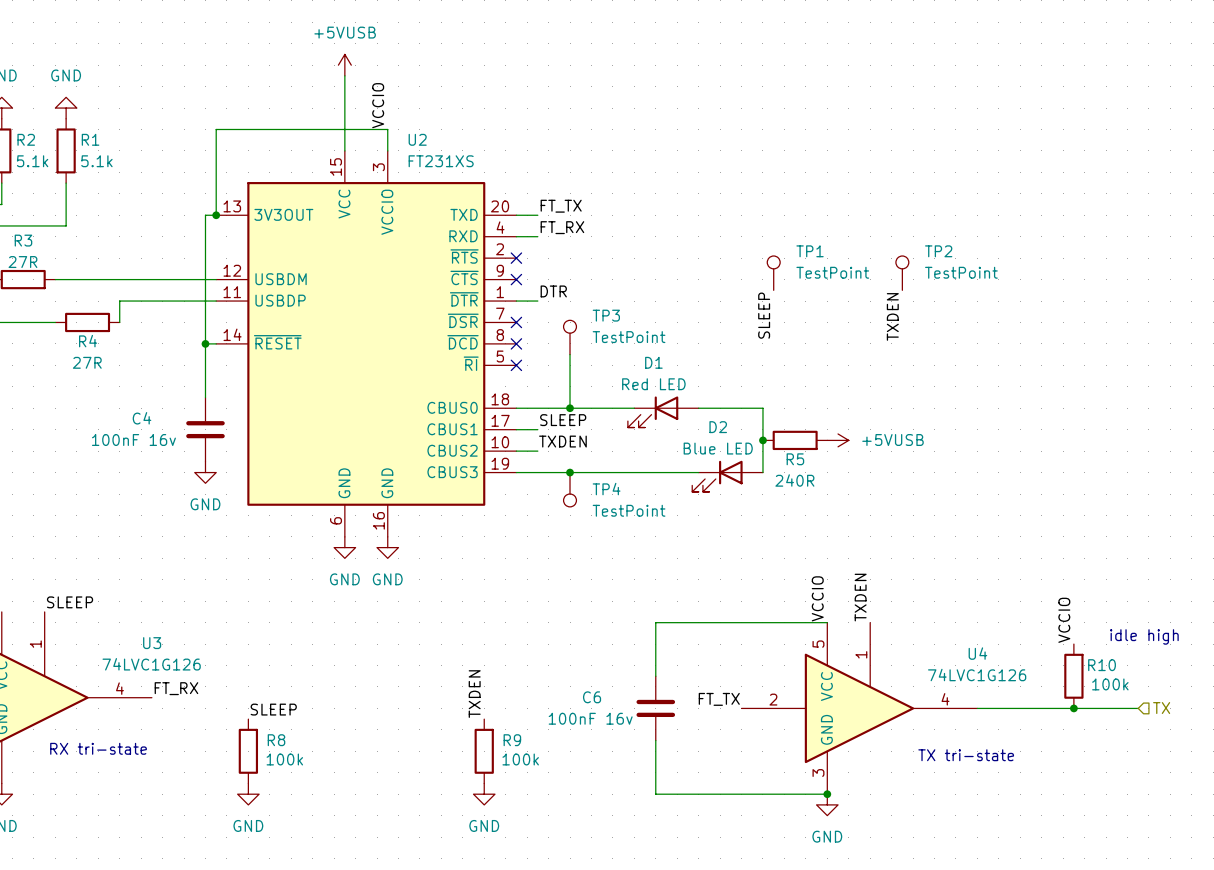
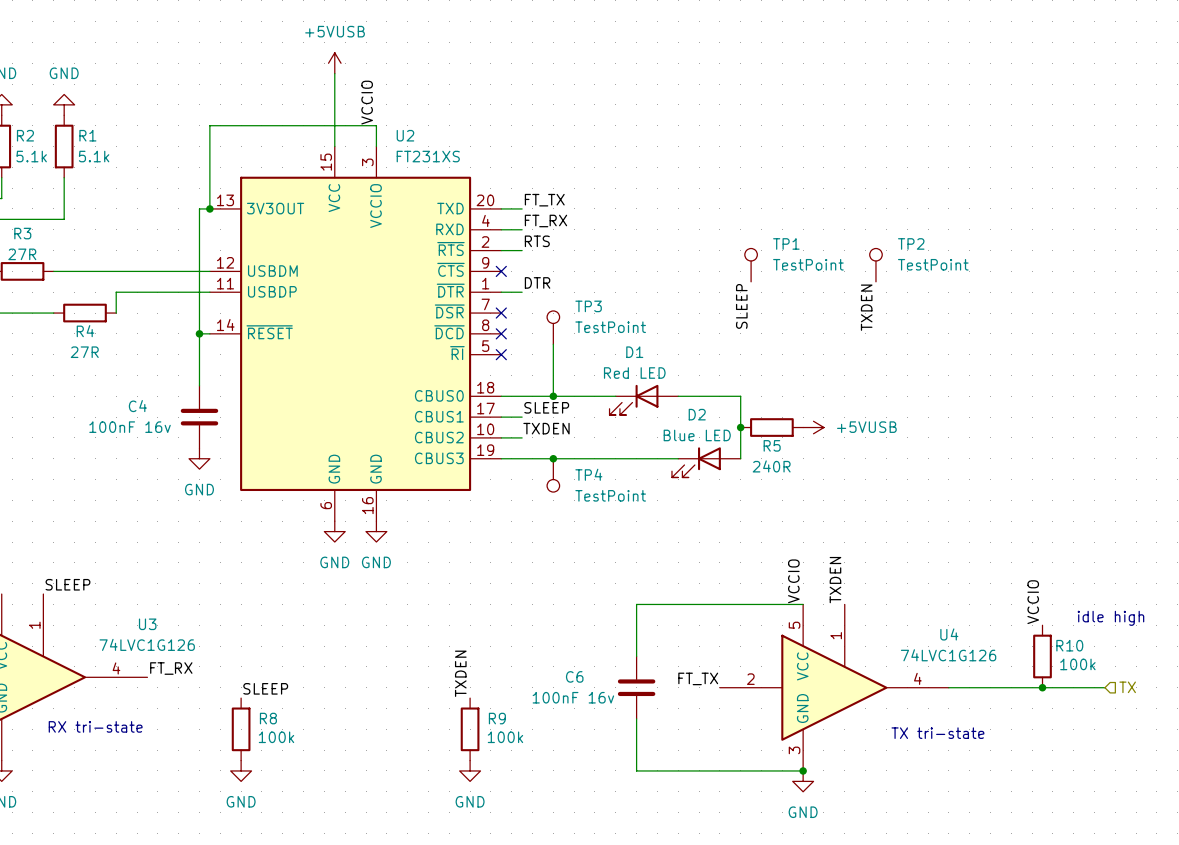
label: none -> RTS (537, 241)
wire: none -> (501, 250) (522, 250)
no-connect mark: (516, 258) -> none

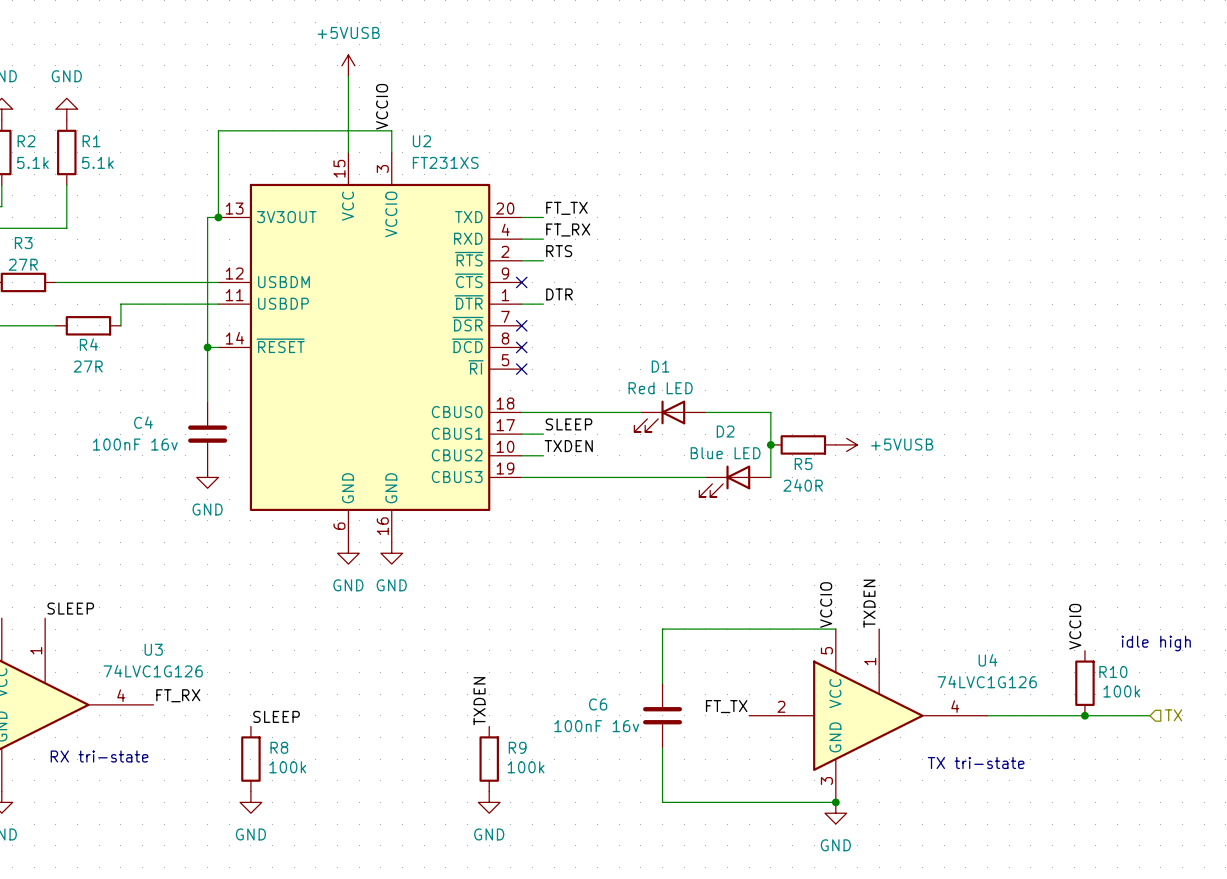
TP1: TestPoint (751, 265) -> none
TP2: TestPoint (875, 265) -> none
label: SLEEP (741, 306) -> none
label: TXDEN (866, 307) -> none
TP3: TestPoint (553, 327) -> none
wire: (553, 344) (553, 396) -> none
junction: (553, 396) -> none
junction: (553, 458) -> none
TP4: TestPoint (553, 475) -> none

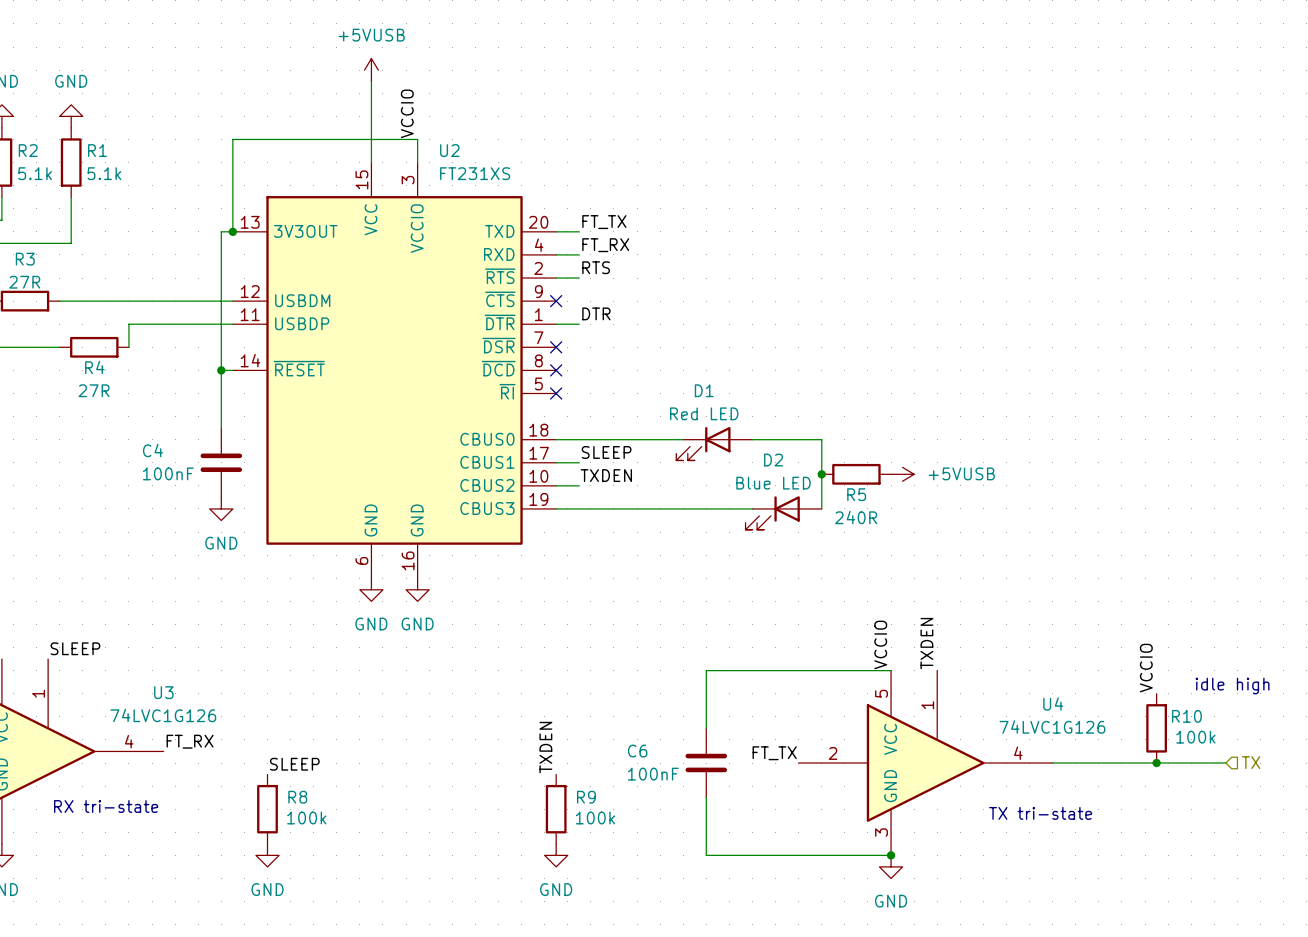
C4 value: 100nF 16v (135, 444) -> 100nF (168, 473)
label position: TXDEN (479, 701) -> TXDEN (545, 747)
C6 value: 100nF 16v (596, 726) -> 100nF (653, 774)
R9 position: (489, 759) -> (556, 809)
power symbol position: GND (489, 802) -> GND (556, 855)

